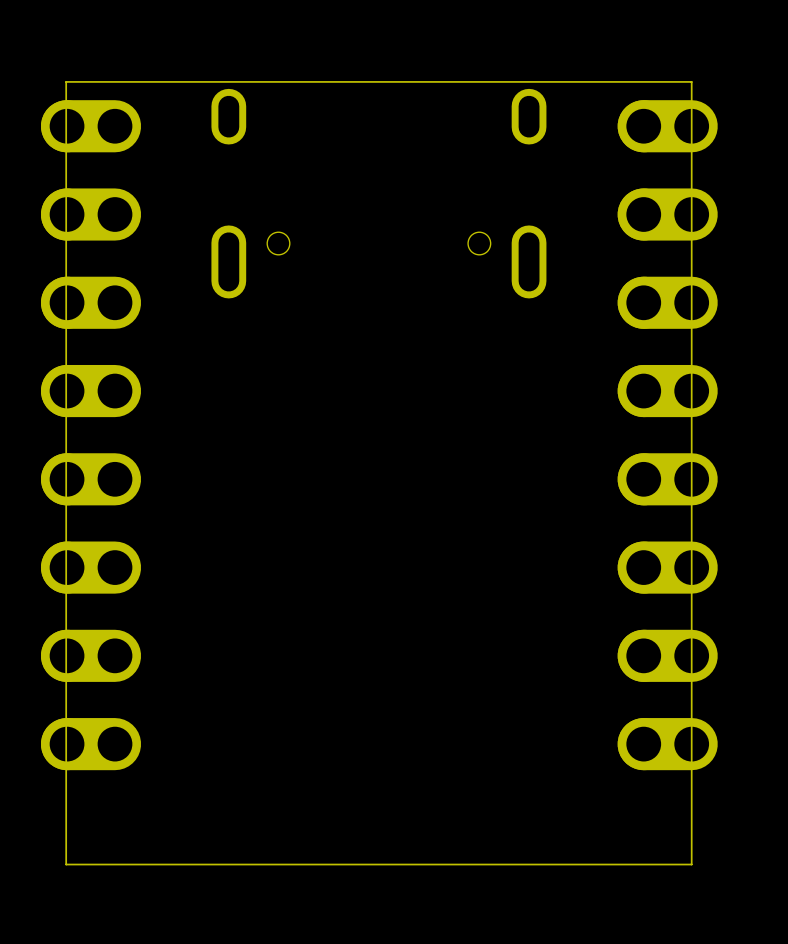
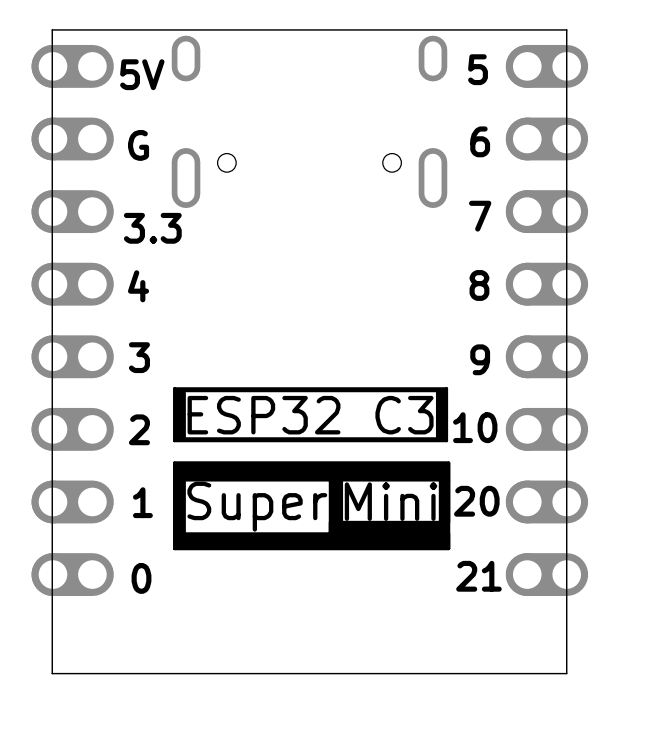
text: none -> 5 (478, 69)
text: none -> 5V (142, 74)
text: none -> 6 (480, 141)
text: none -> G (138, 145)
text: none -> 7 (480, 216)
text: none -> 3.3 (152, 228)
text: none -> 8 (479, 285)
text: none -> 4 (138, 286)
text: none -> 3 (139, 357)
text: none -> 9 (480, 359)
drawing: none -> [173, 389, 451, 551]
line: none -> (446, 388) (174, 388) (174, 440) (446, 440) (446, 388)
line: none -> (444, 390) (176, 390) (176, 438) (444, 438) (444, 390)
text: none -> ESP32 C3 (310, 415)
text: none -> 10 (475, 427)
text: none -> 2 (139, 429)
text: none -> 20 (476, 501)
text: none -> Mini (391, 501)
text: none -> 1 (142, 502)
text: none -> Super (257, 506)
text: none -> 21 (478, 576)
text: none -> 0 (141, 578)

